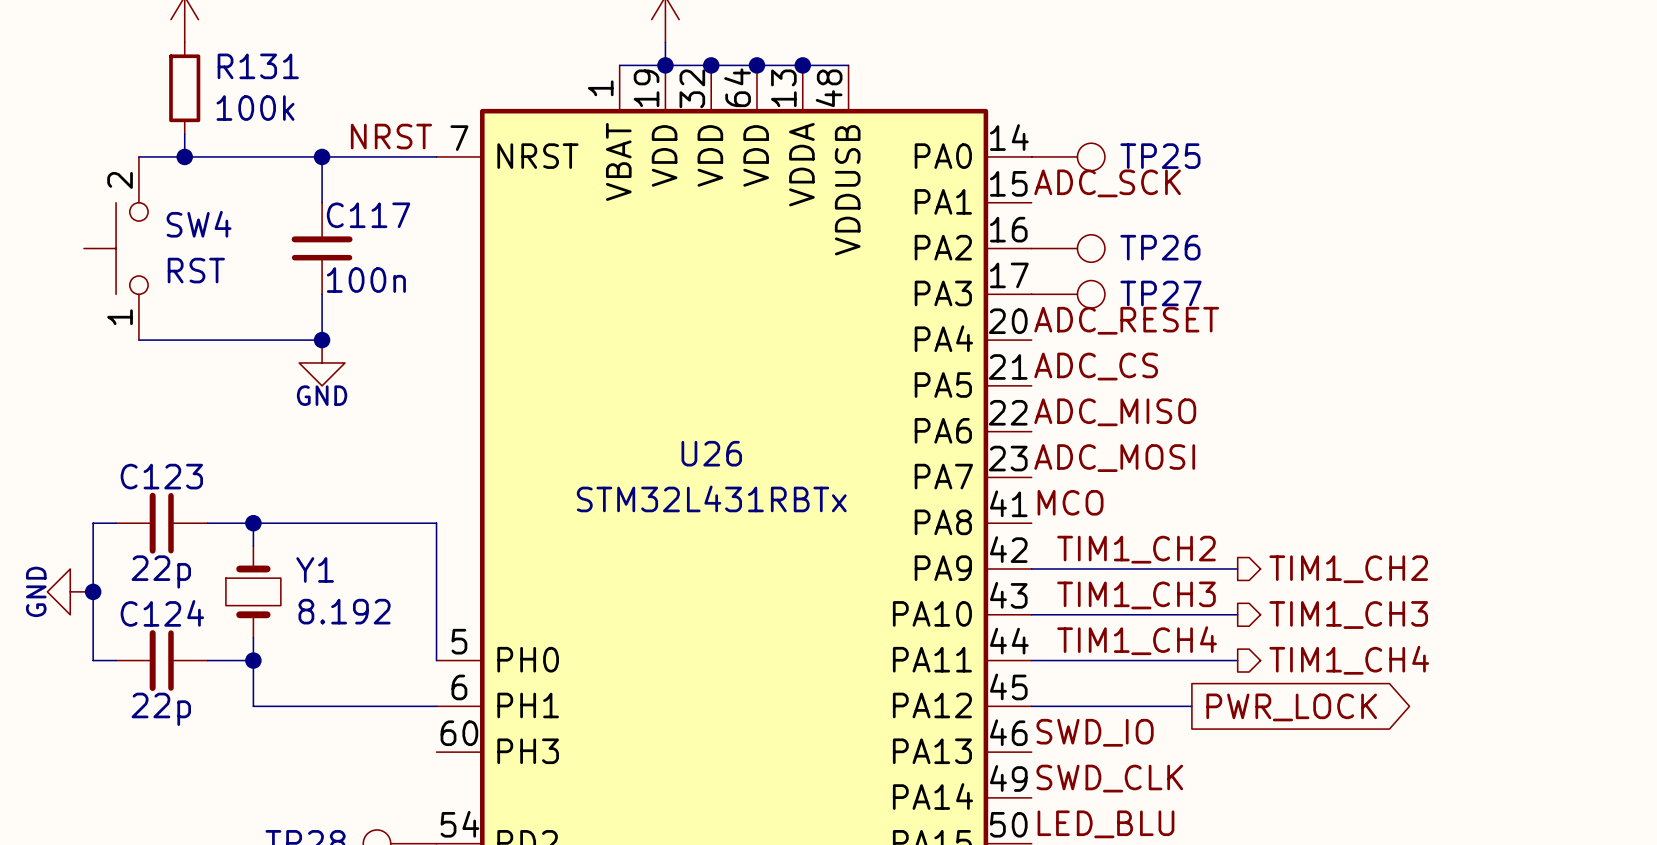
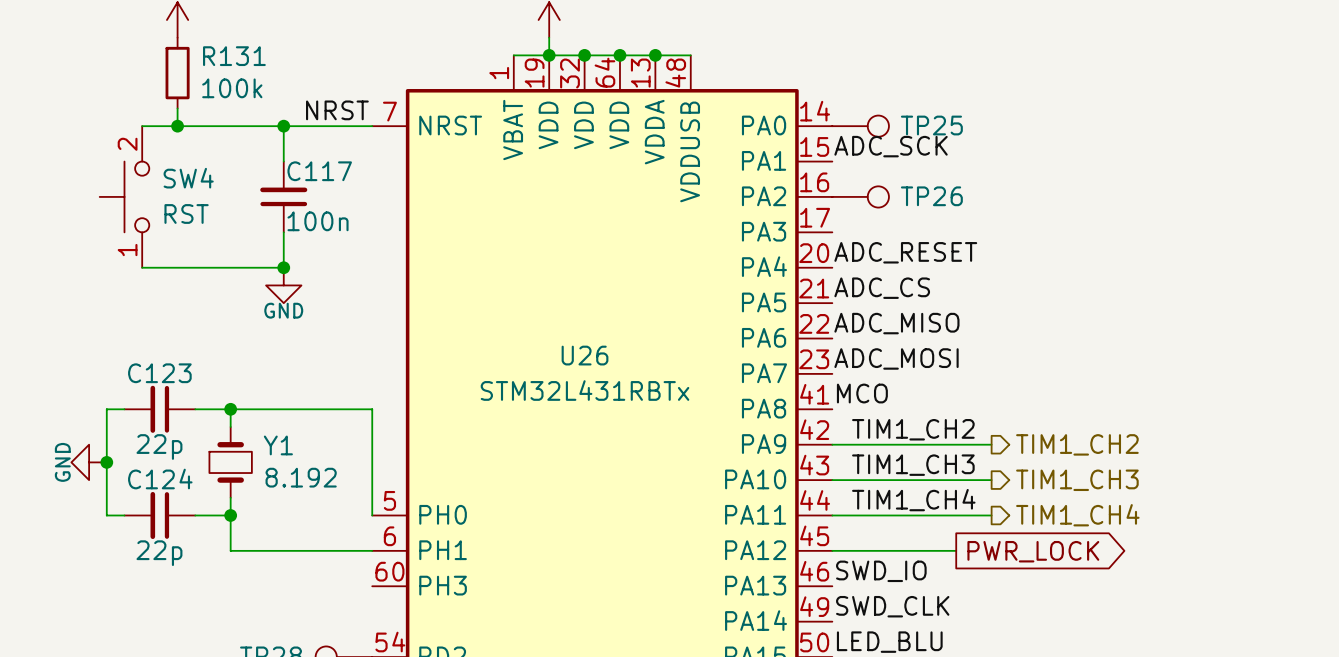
TP27: (1068, 294) -> none

